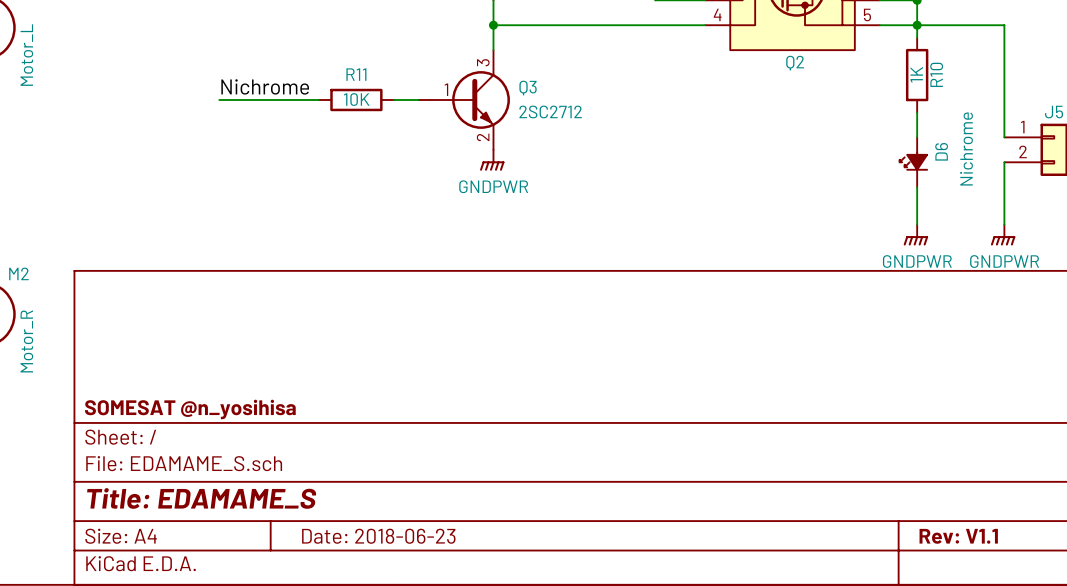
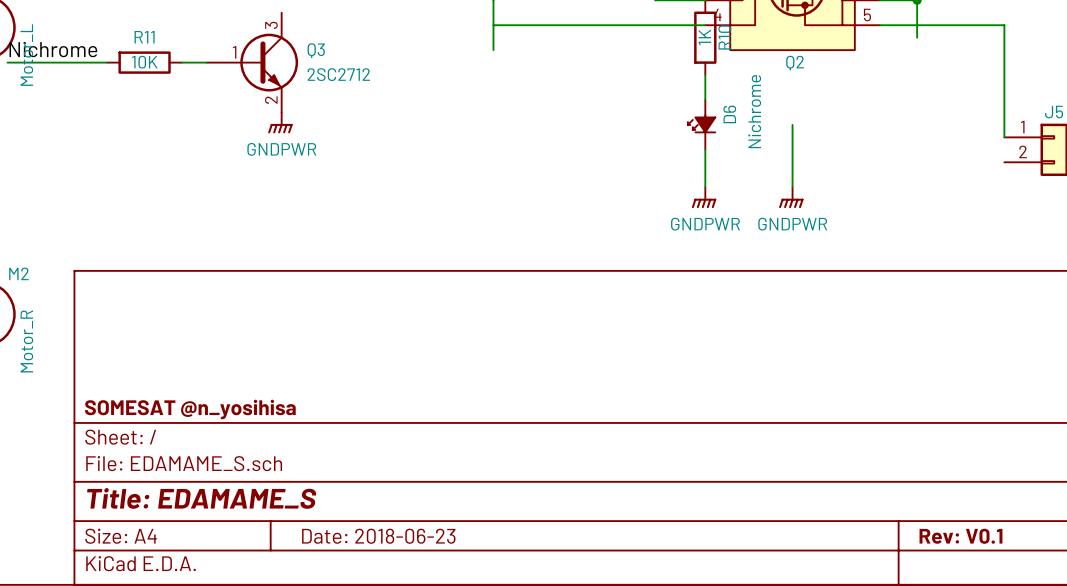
junction: (493, 25) -> none
junction: (917, 25) -> none
R10 position: (917, 75) -> (705, 37)
label position: Nichrome (265, 86) -> Nichrome (53, 49)
wire: (219, 99) (319, 99) -> (7, 62) (107, 62)
R11 position: (356, 99) -> (144, 62)
wire: (393, 99) (418, 99) -> (181, 62) (206, 62)
Q3 position: (464, 99) -> (252, 62)
wire: (917, 112) (917, 137) -> (705, 75) (705, 99)
power symbol: none -> GNDPWR (280, 122)
power symbol: GNDPWR (492, 160) -> none
D6 position: (913, 162) -> (701, 124)
wire: (1004, 162) (1004, 224) -> (792, 124) (792, 187)
wire: (917, 187) (917, 224) -> (705, 149) (705, 187)
power symbol: none -> GNDPWR (704, 197)
power symbol: none -> GNDPWR (791, 197)
power symbol: GNDPWR (915, 235) -> none
power symbol: GNDPWR (1003, 235) -> none
title block: Rev: V1.1 (958, 536) -> Rev: V0.1 (960, 536)

